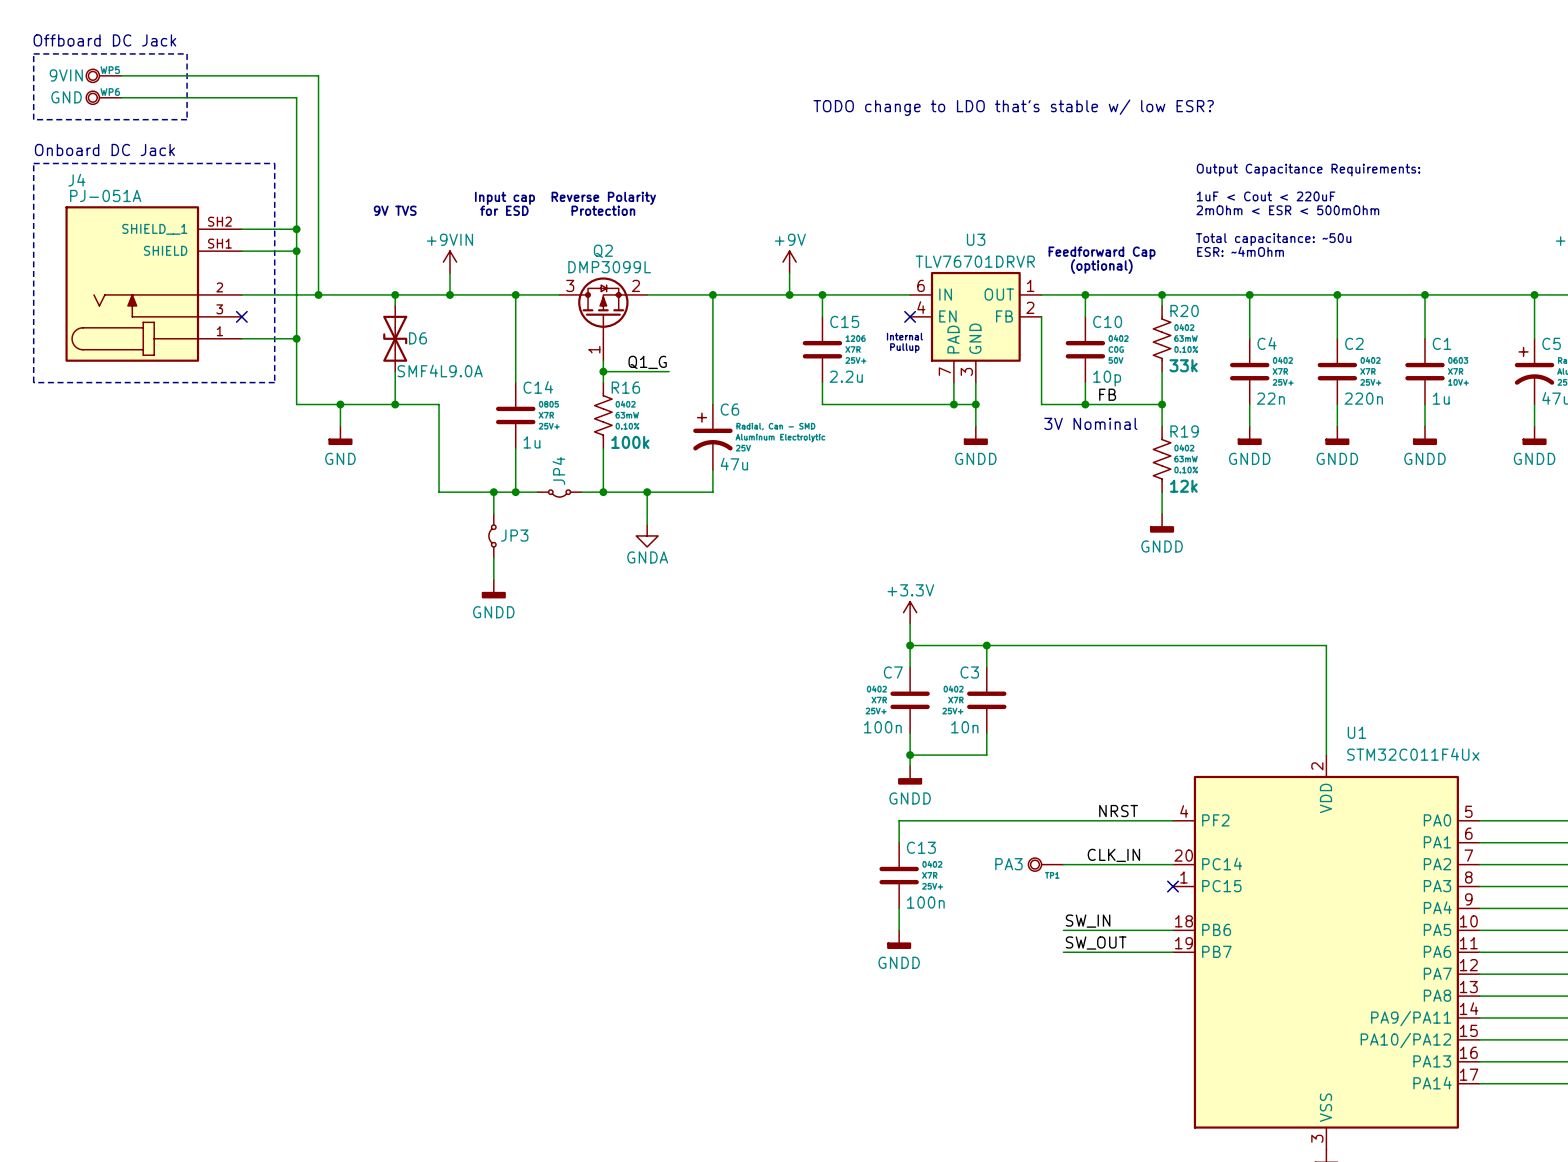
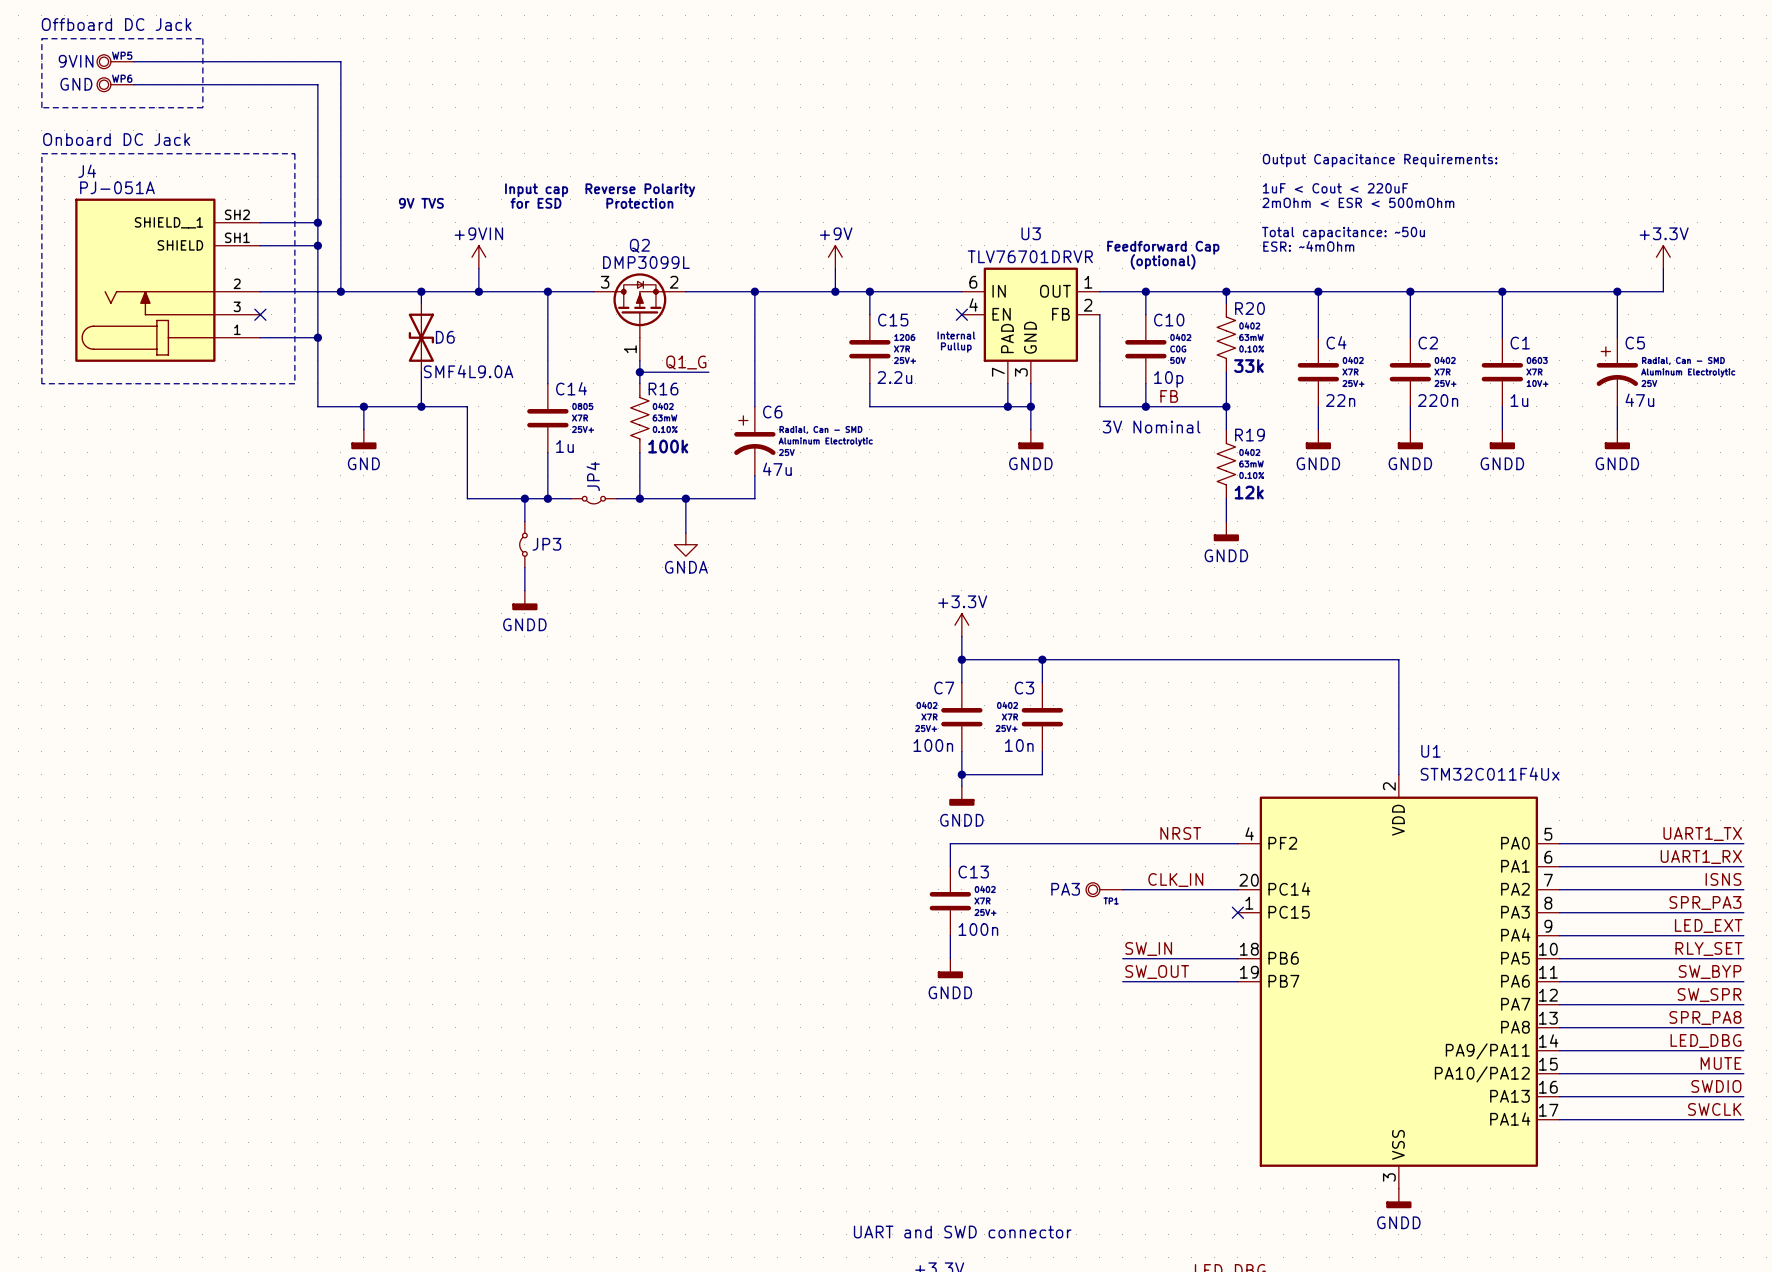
text: TODO change to LDO that's stable w/ low ESR? (1013, 107) -> none

